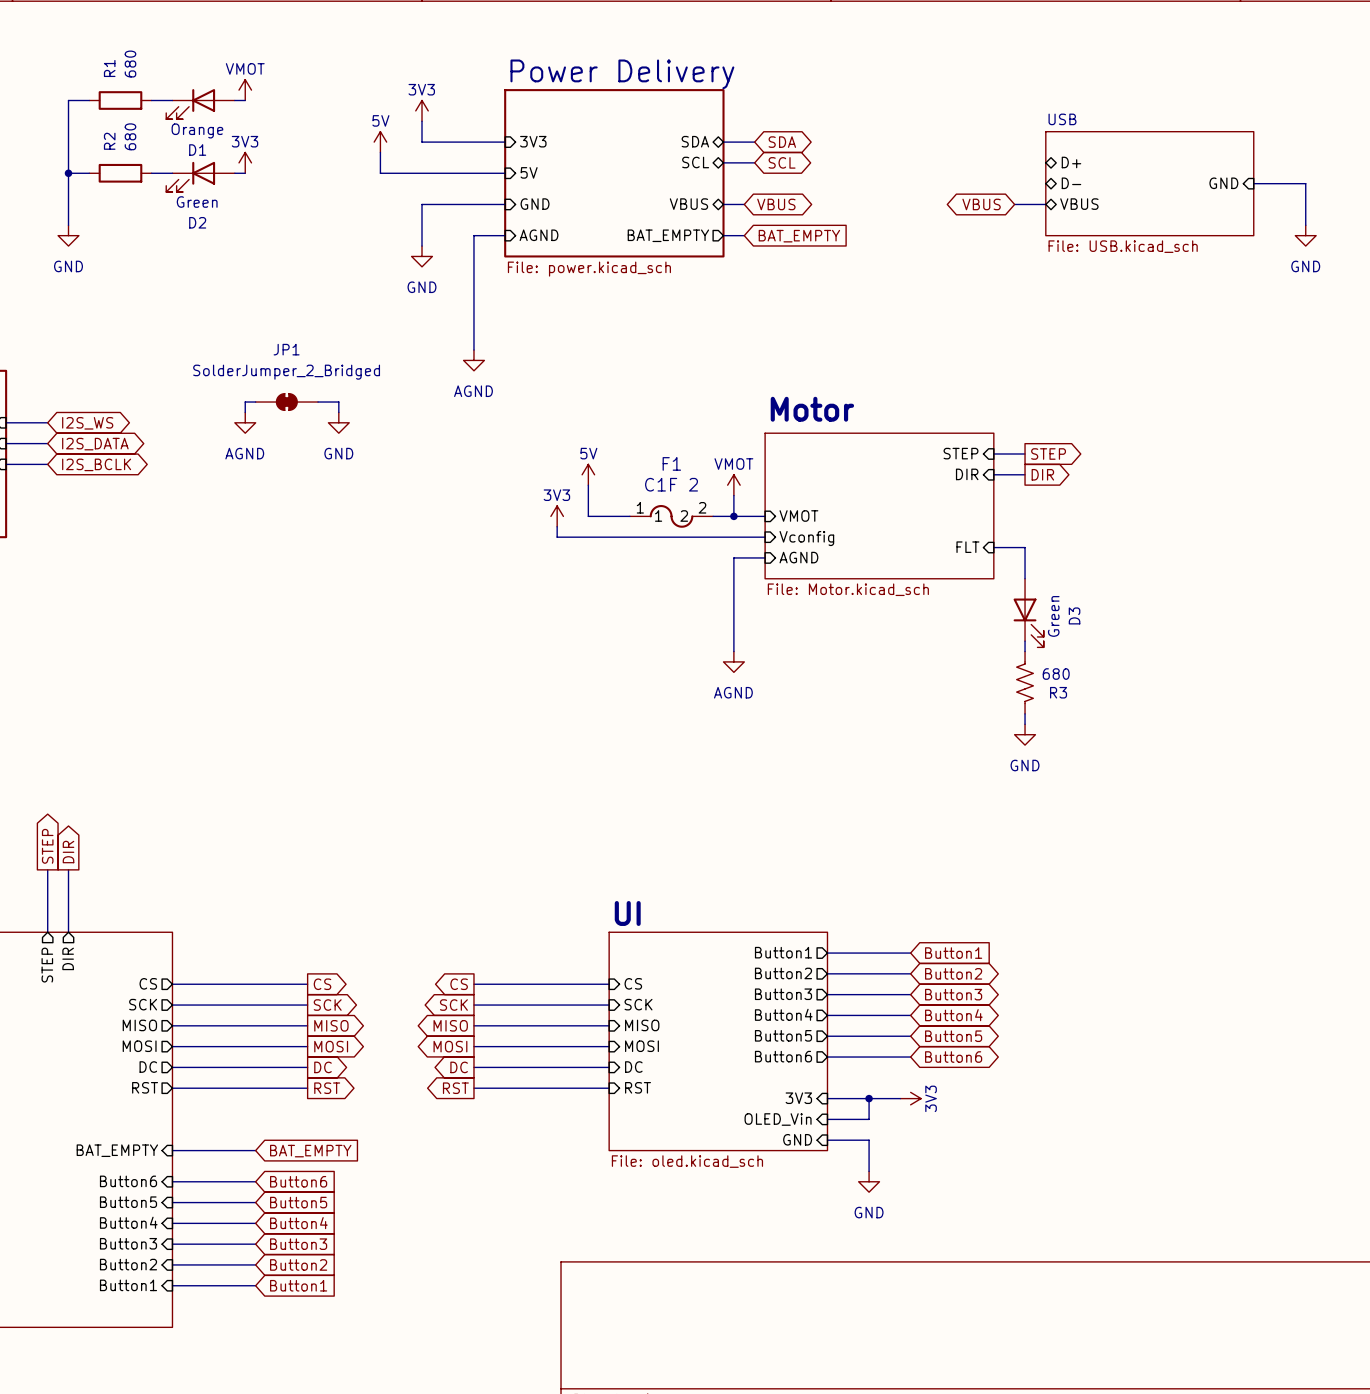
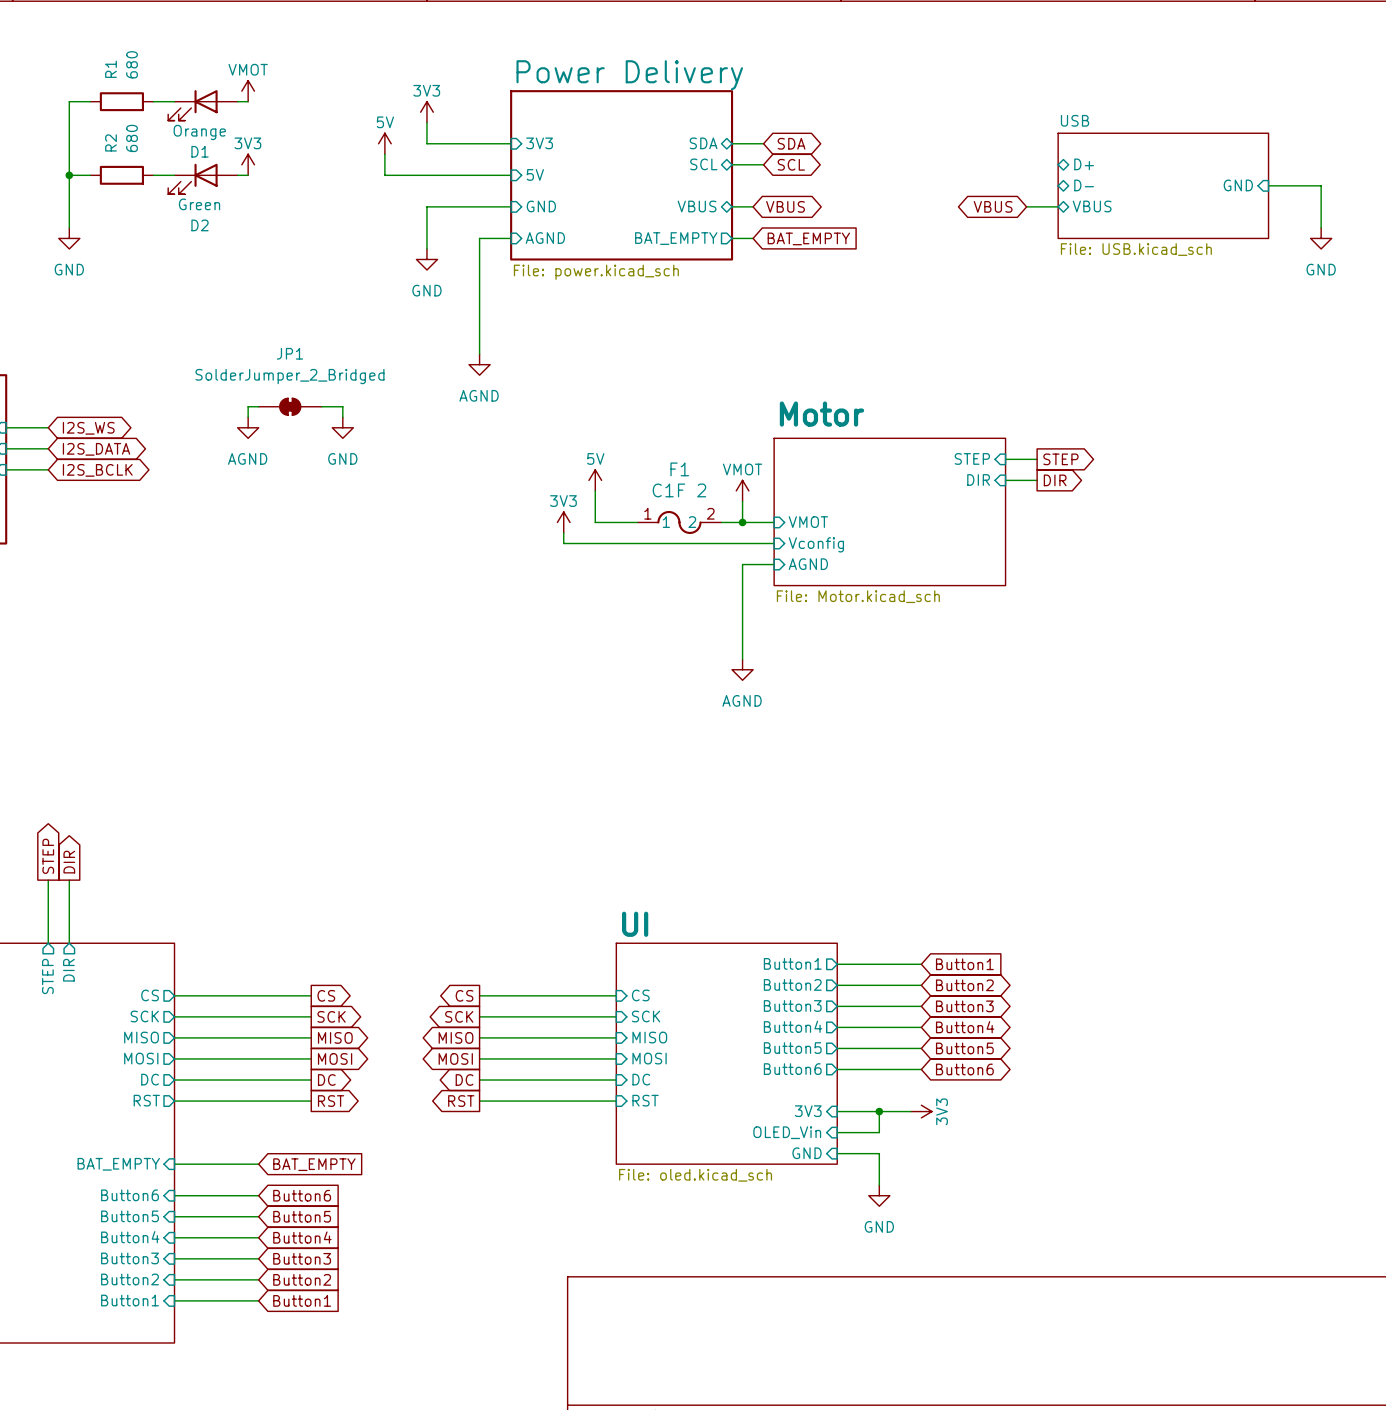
sheet pin: FLT (967, 547) -> none
wire: (993, 547) (1025, 547) (1025, 578) -> none
D3: Green (1028, 613) -> none
wire: (1025, 641) (1025, 651) -> none
R3: 680 (1025, 682) -> none
wire: (1025, 713) (1025, 724) -> none
power symbol: GND (1025, 734) -> none

